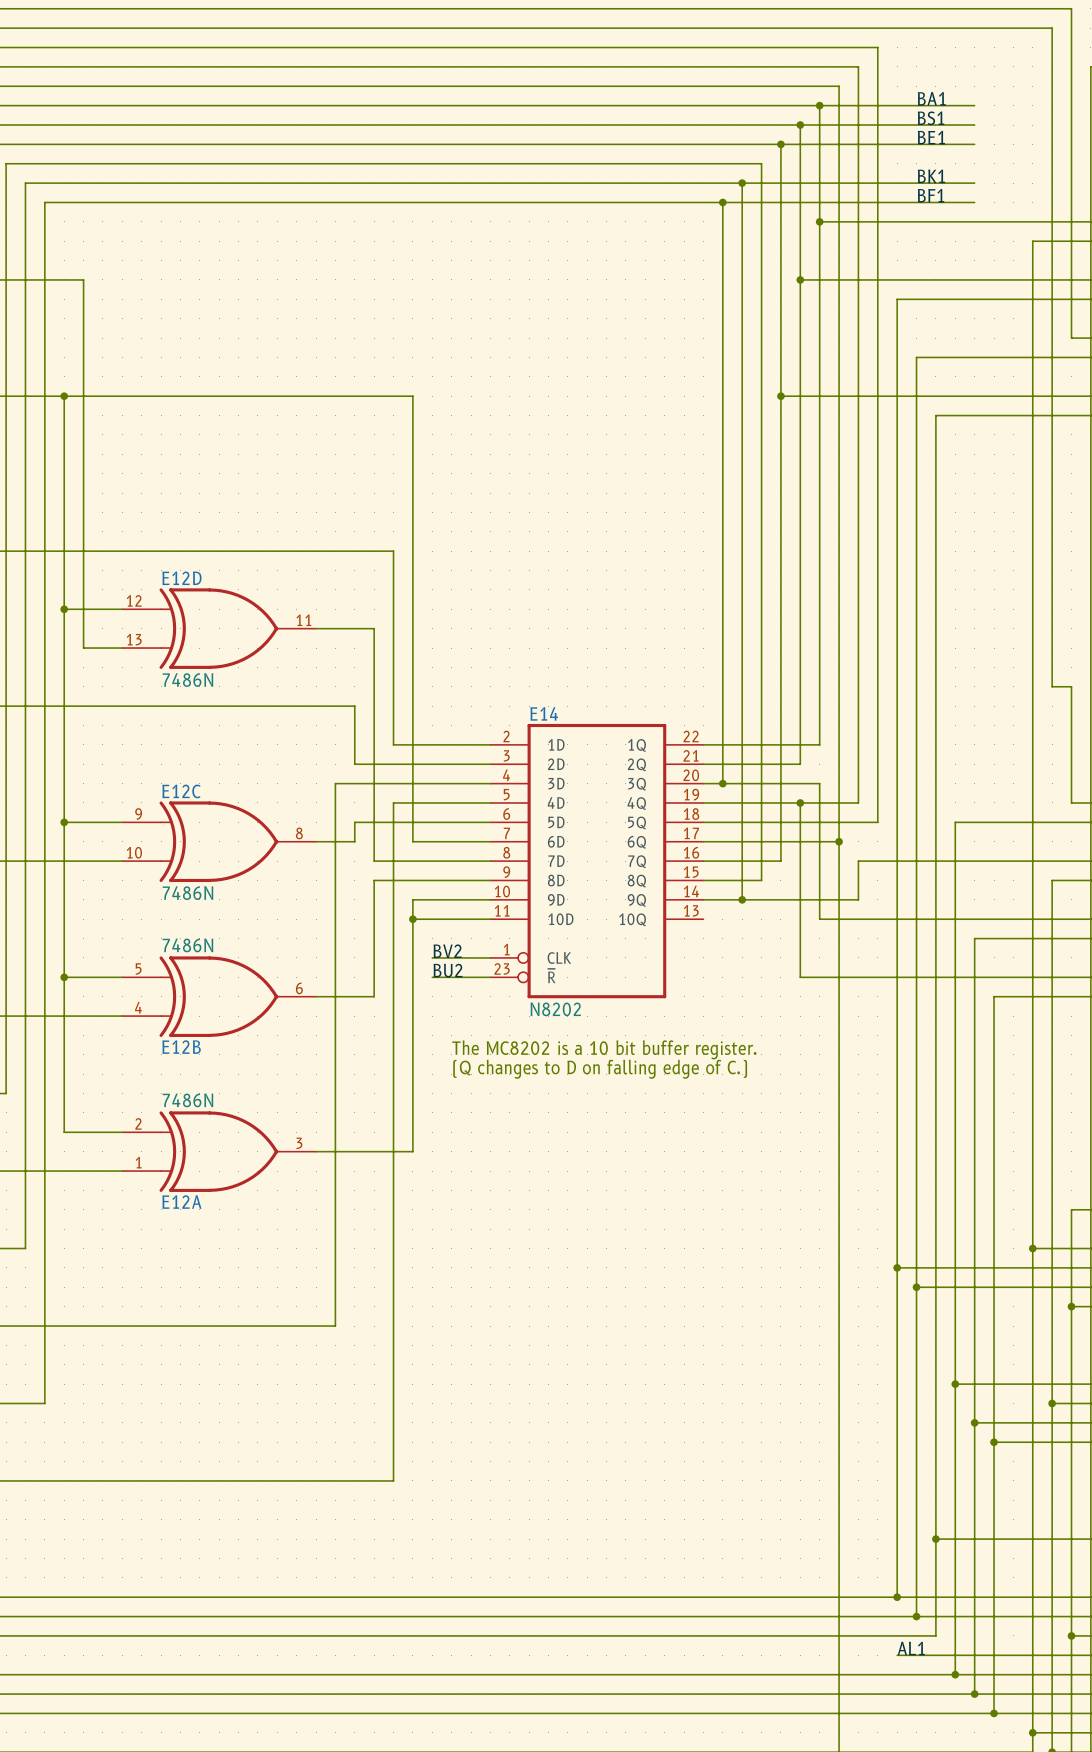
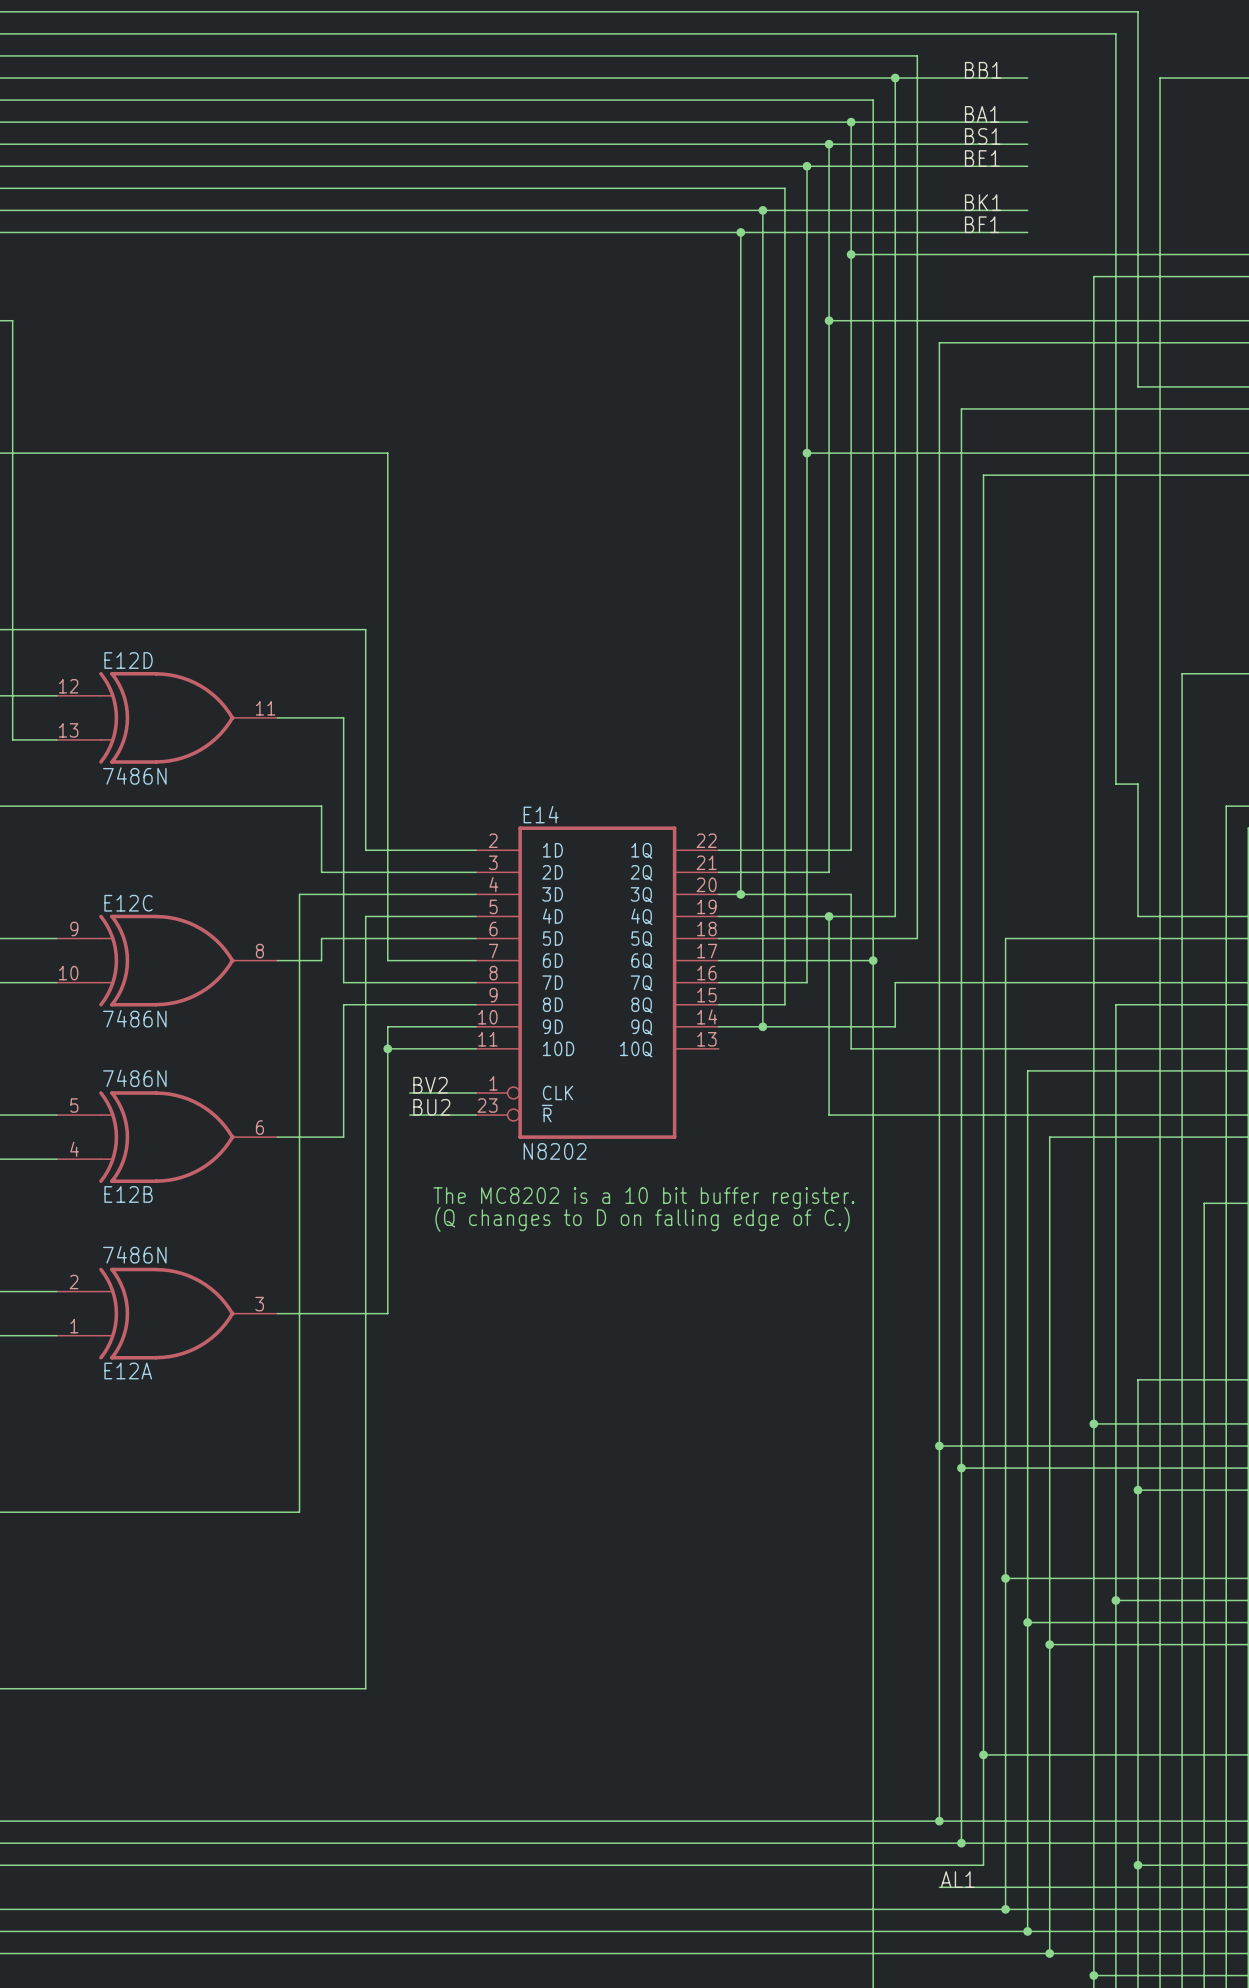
label: none -> BB1 (983, 70)
wire: none -> (895, 78) (1027, 78)
junction: none -> (895, 78)

